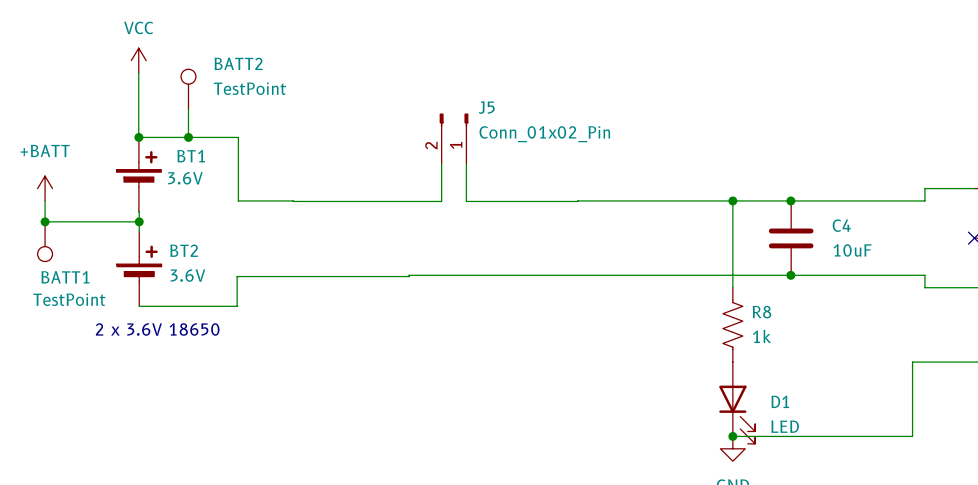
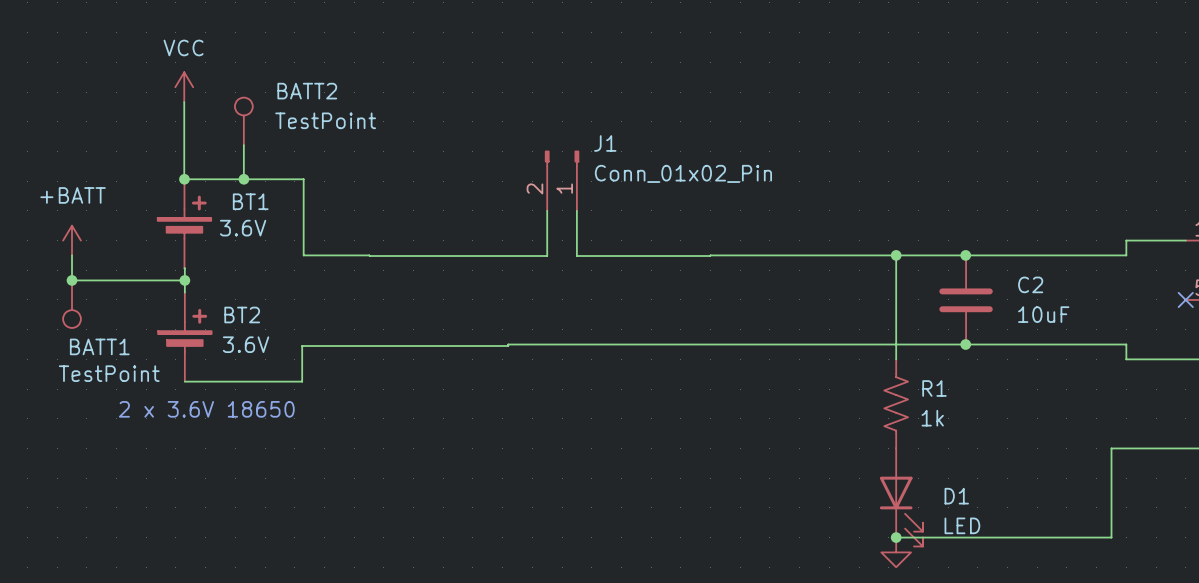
J5 name: J5 (486, 107) -> J1 (605, 143)
C4 name: C4 (841, 225) -> C2 (1030, 284)
R8 name: R8 (761, 312) -> R1 (934, 388)

